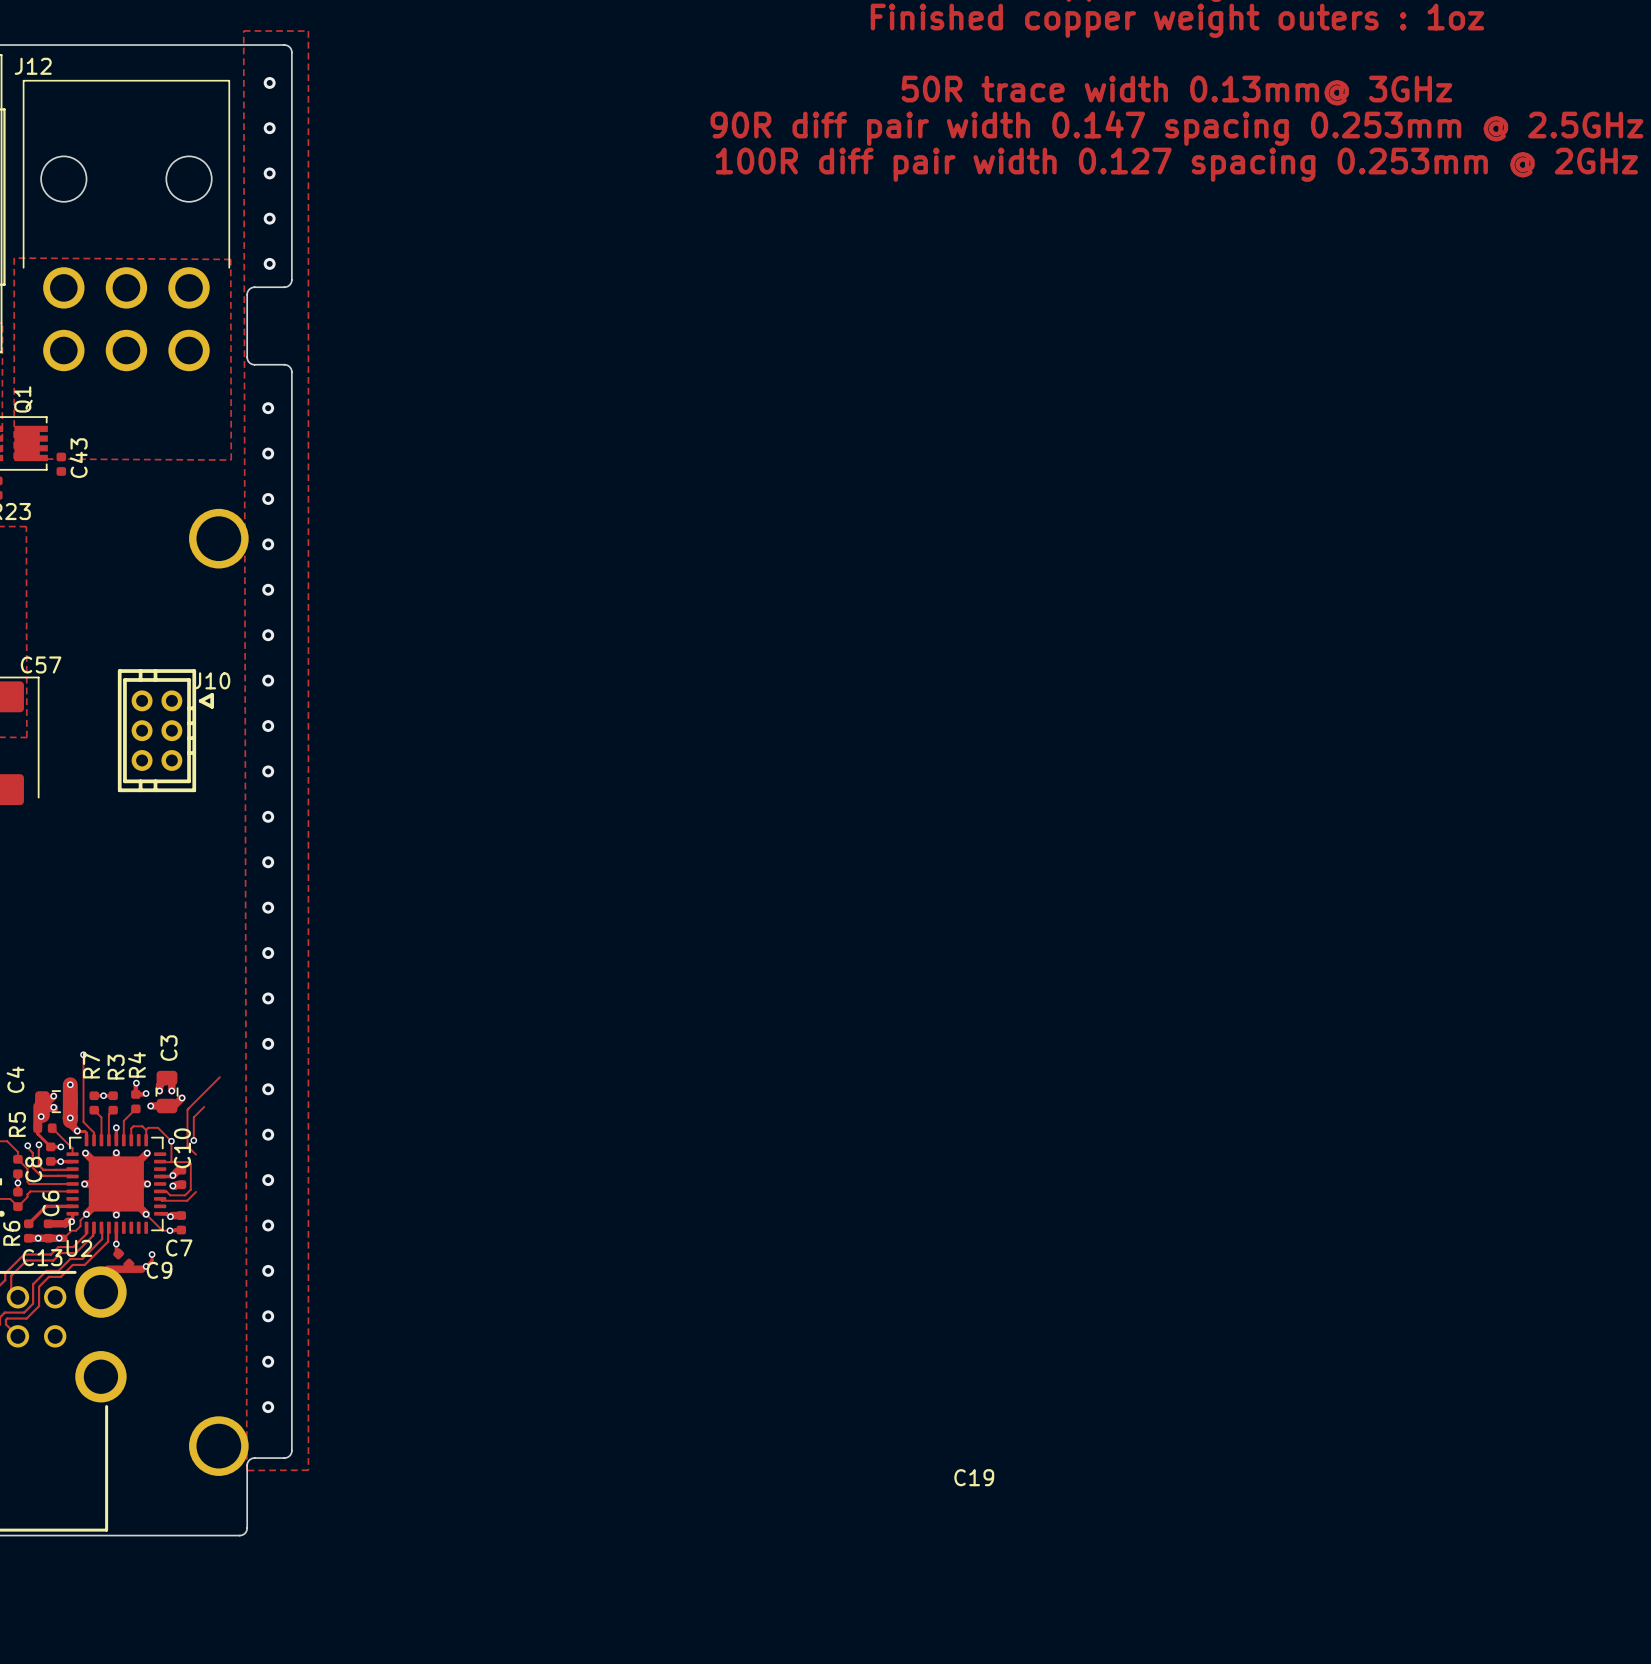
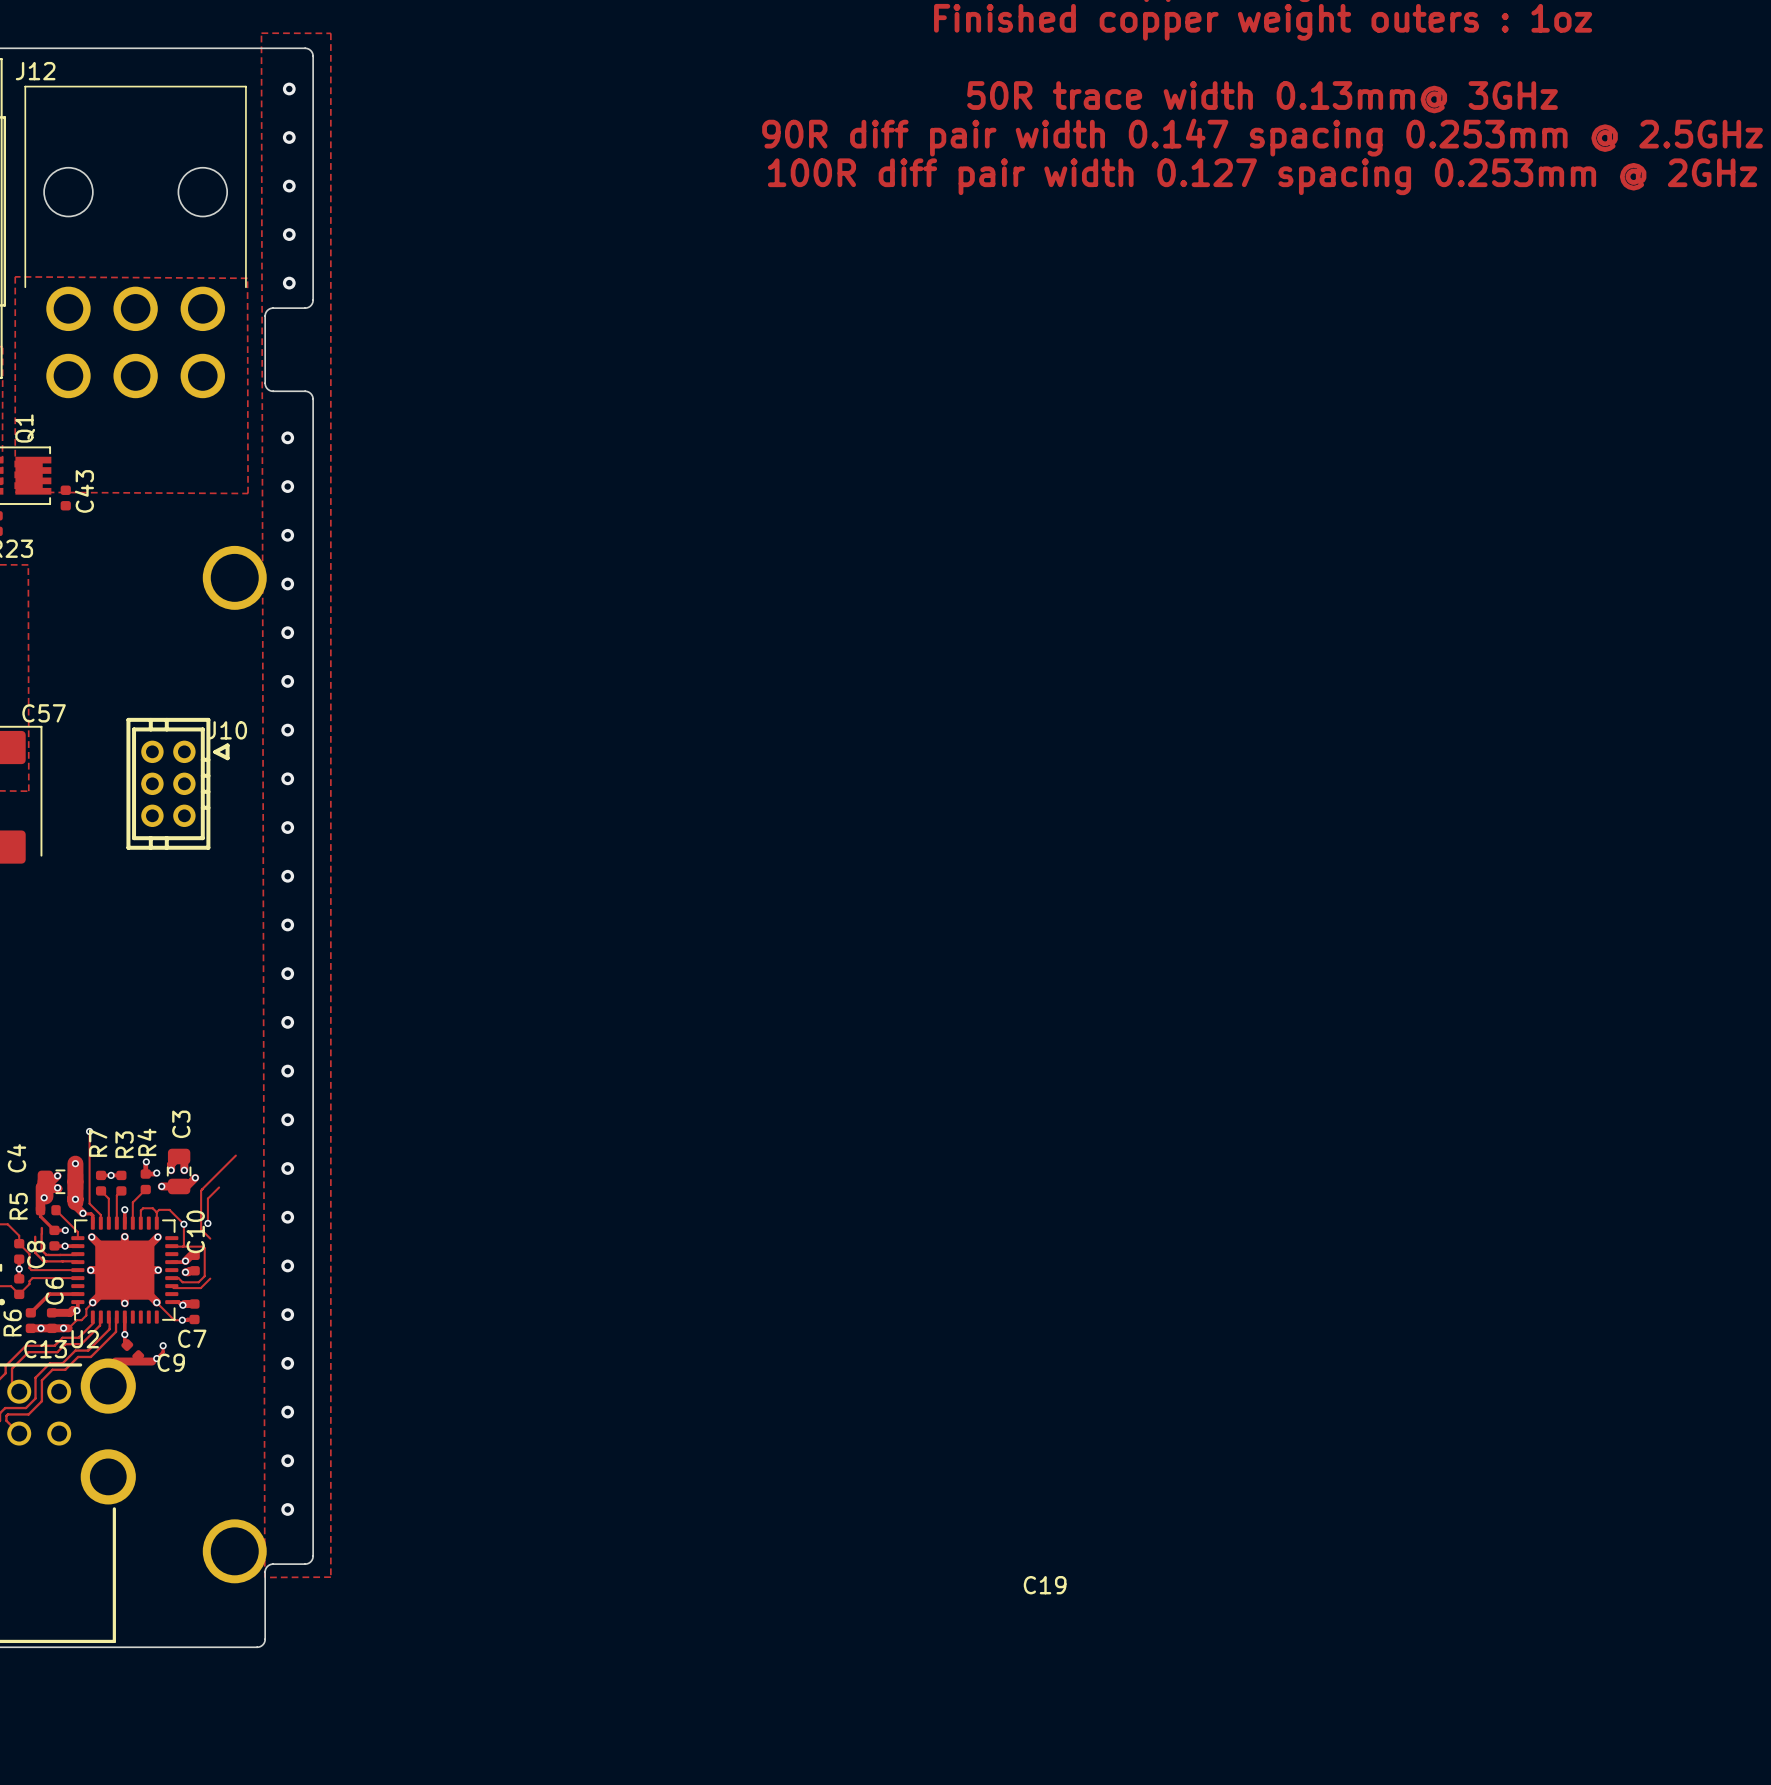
via: (38, 1144) -> none
track: (27, 1145) (32, 1152) -> none
via: (27, 1145) -> none

